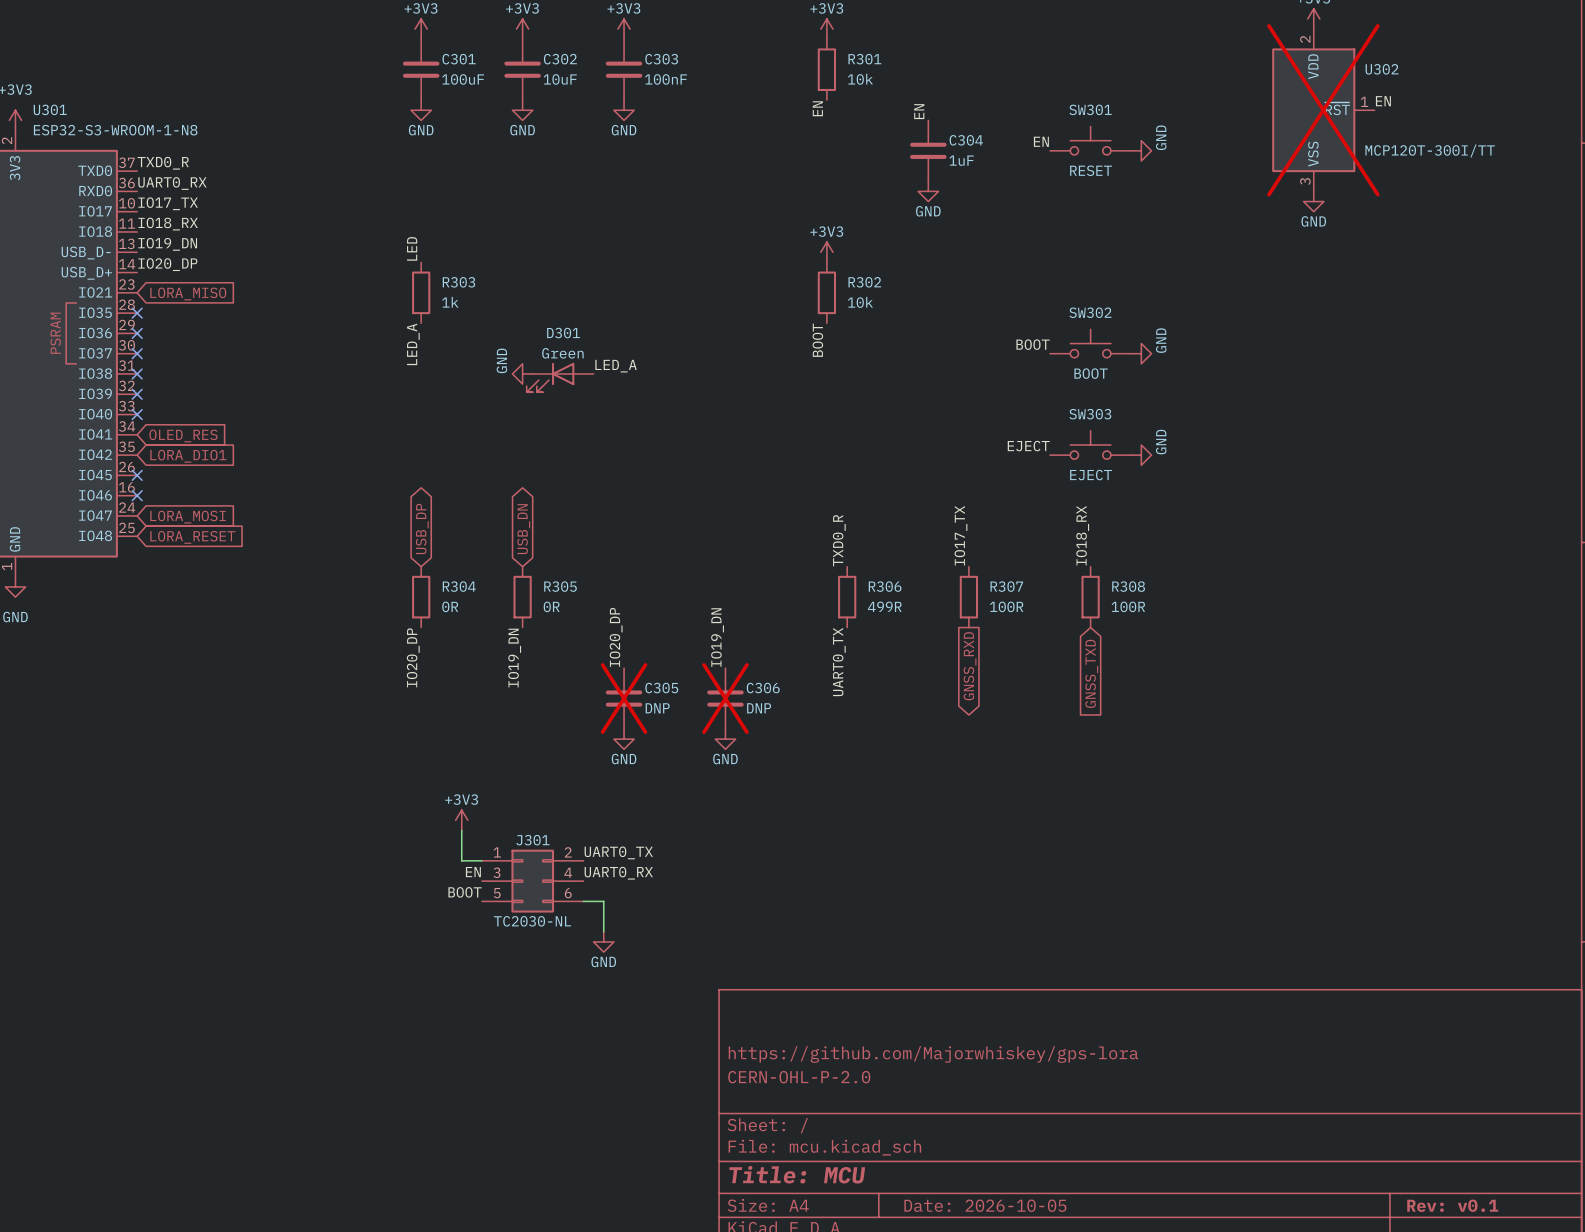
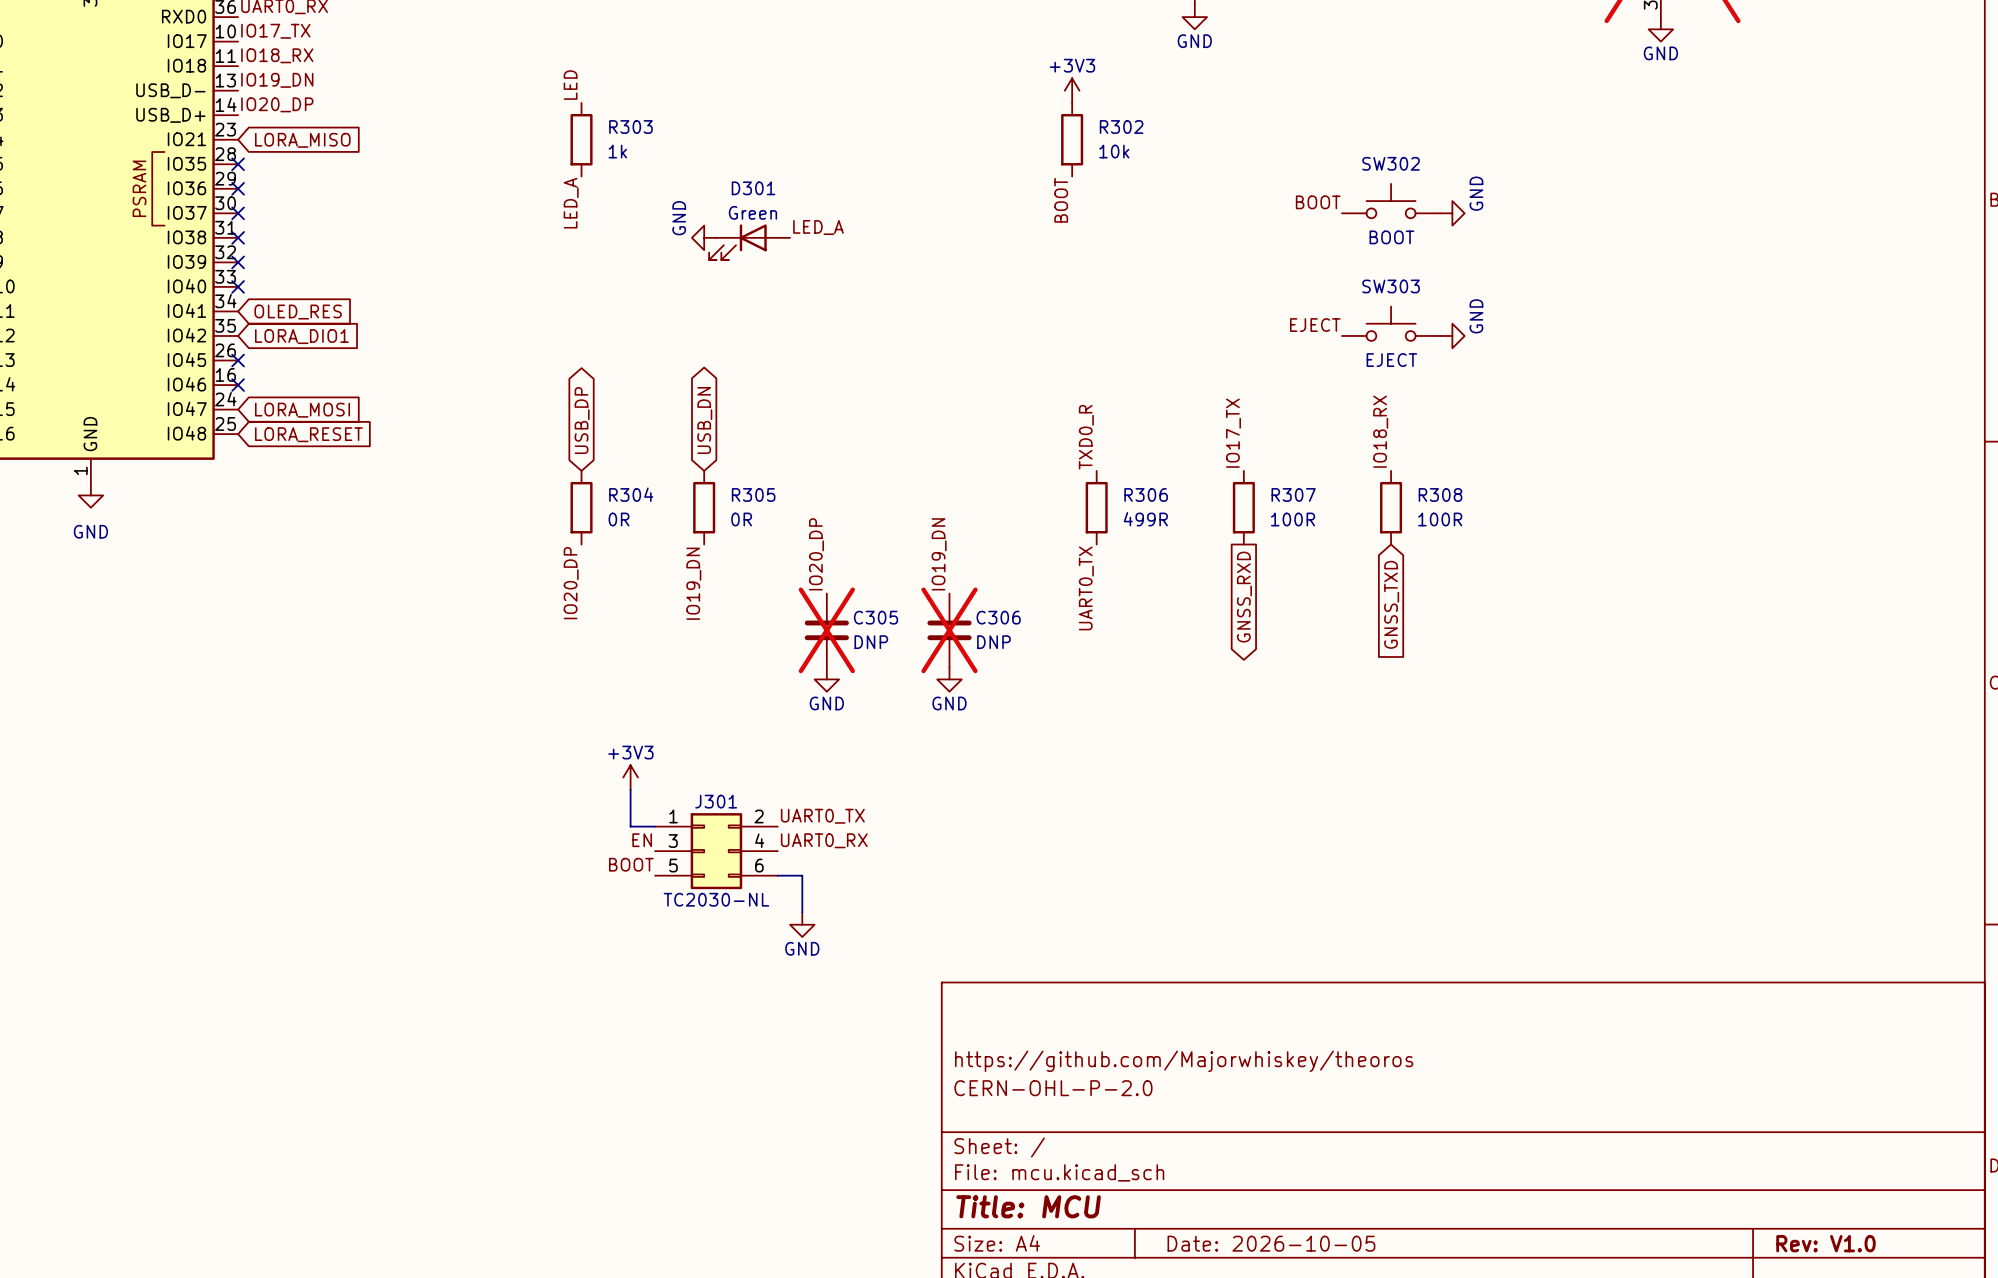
title block: https://github.com/Majorwhiskey/gps-lora (933, 1054) -> https://github.com/Majorwhiskey/theoros (1184, 1061)
title block: Rev: v0.1 (1452, 1205) -> Rev: V1.0 (1825, 1243)

